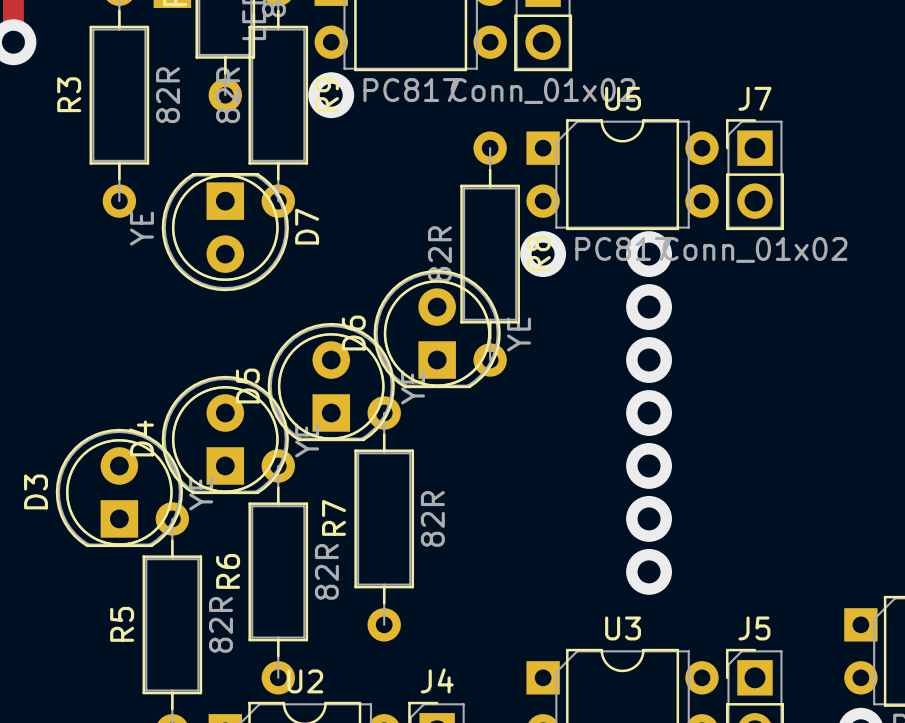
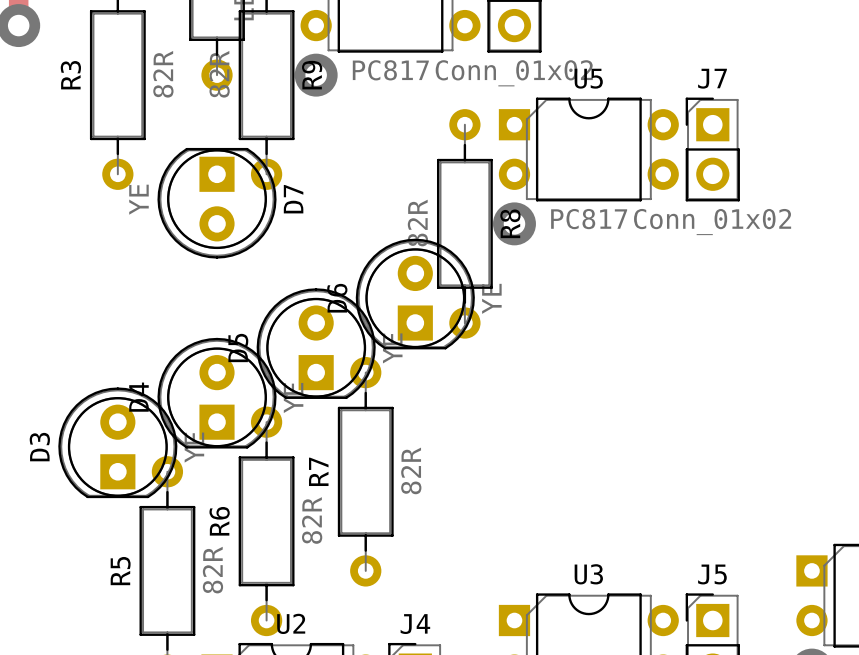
via: (649, 254) -> none
via: (649, 307) -> none
via: (649, 360) -> none
via: (649, 412) -> none
via: (649, 465) -> none
via: (649, 518) -> none
via: (649, 571) -> none

